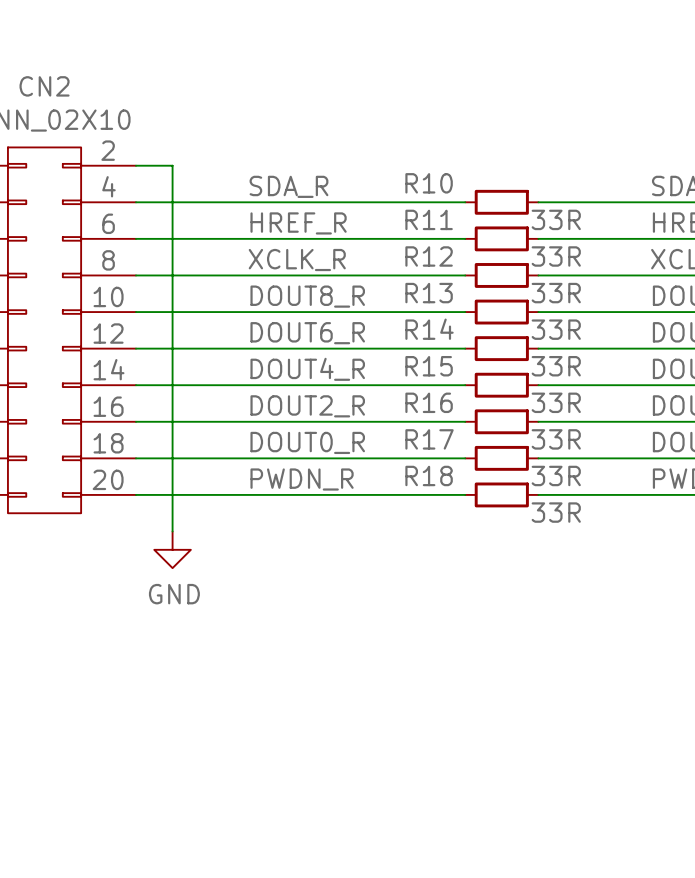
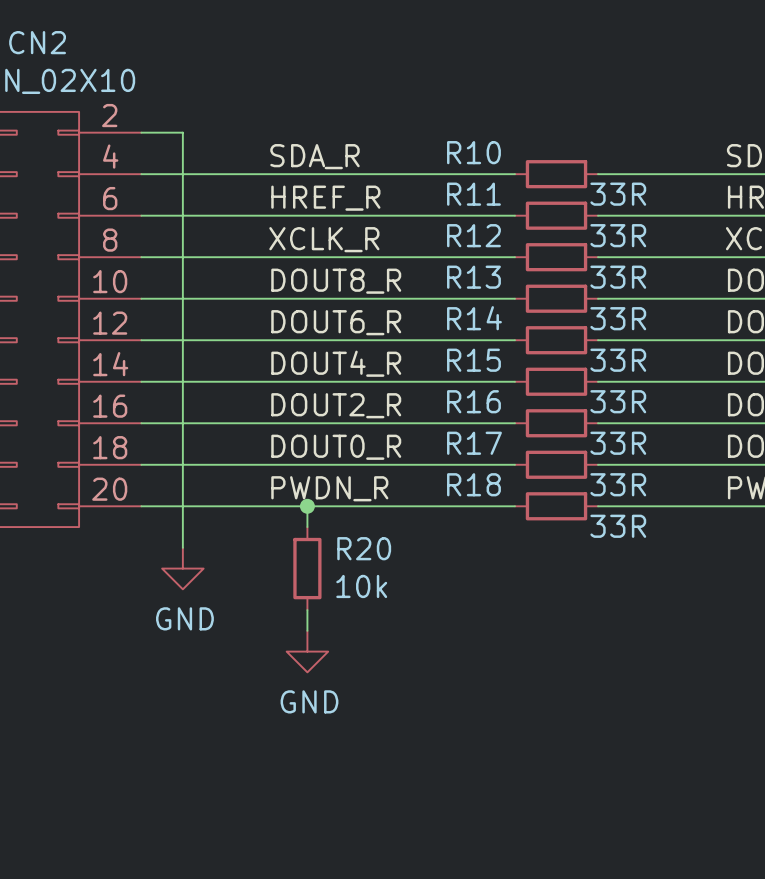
wire: none -> (307, 506) (307, 527)
junction: none -> (307, 506)
R20: none -> 10k (307, 568)
wire: none -> (307, 610) (307, 630)
power symbol: none -> GND (307, 651)

